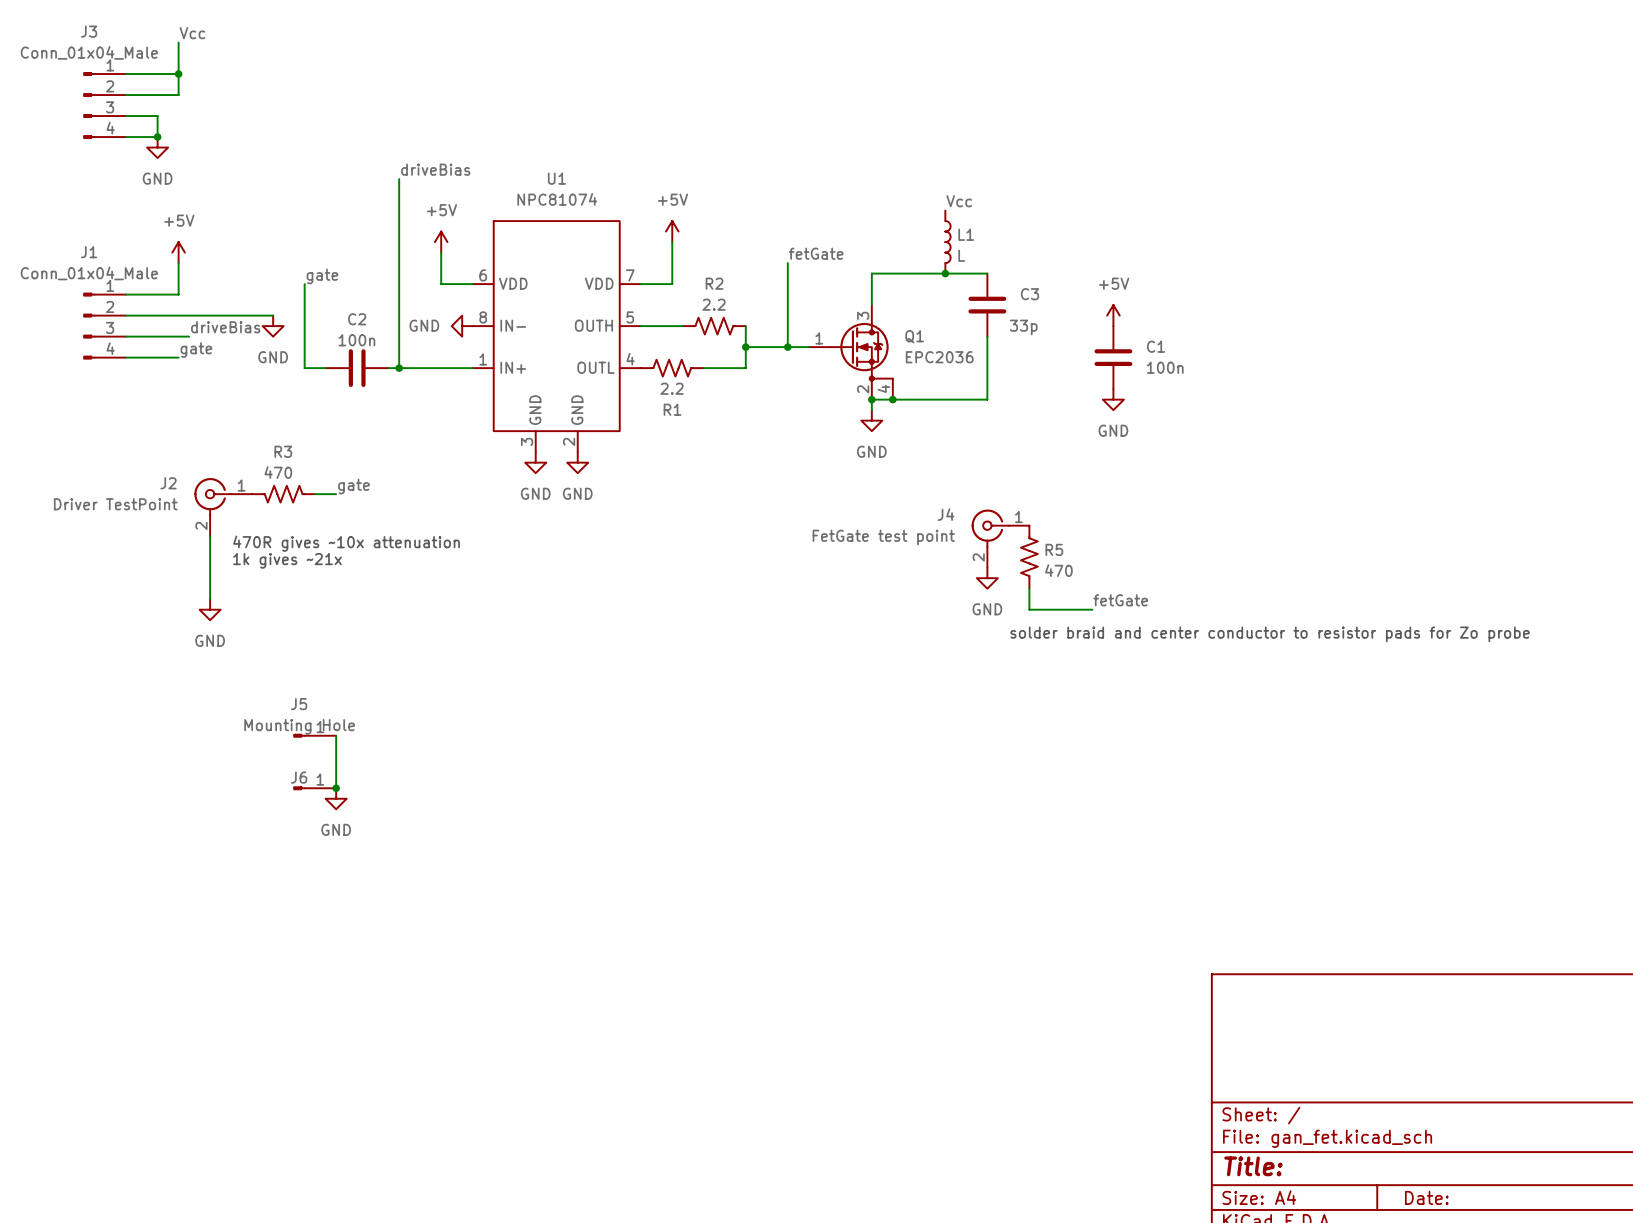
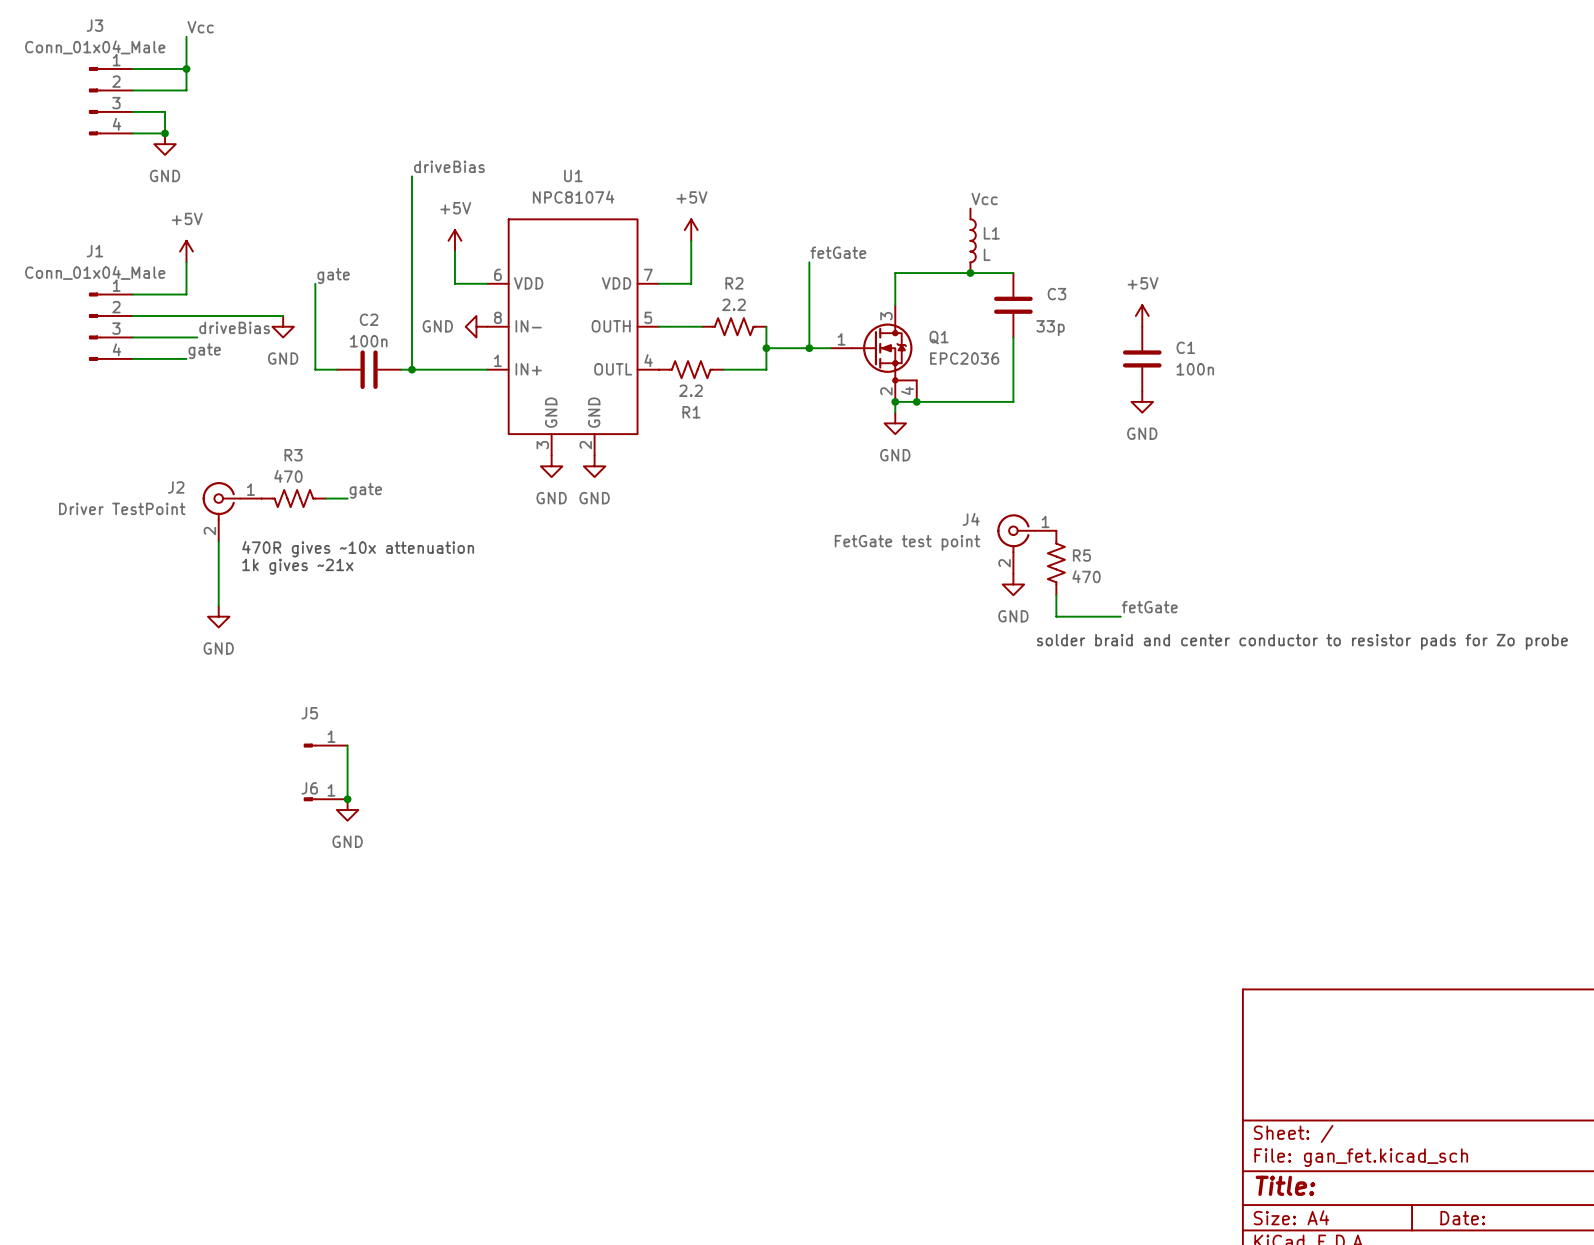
J5 value: Mounting Hole (299, 726) -> none

